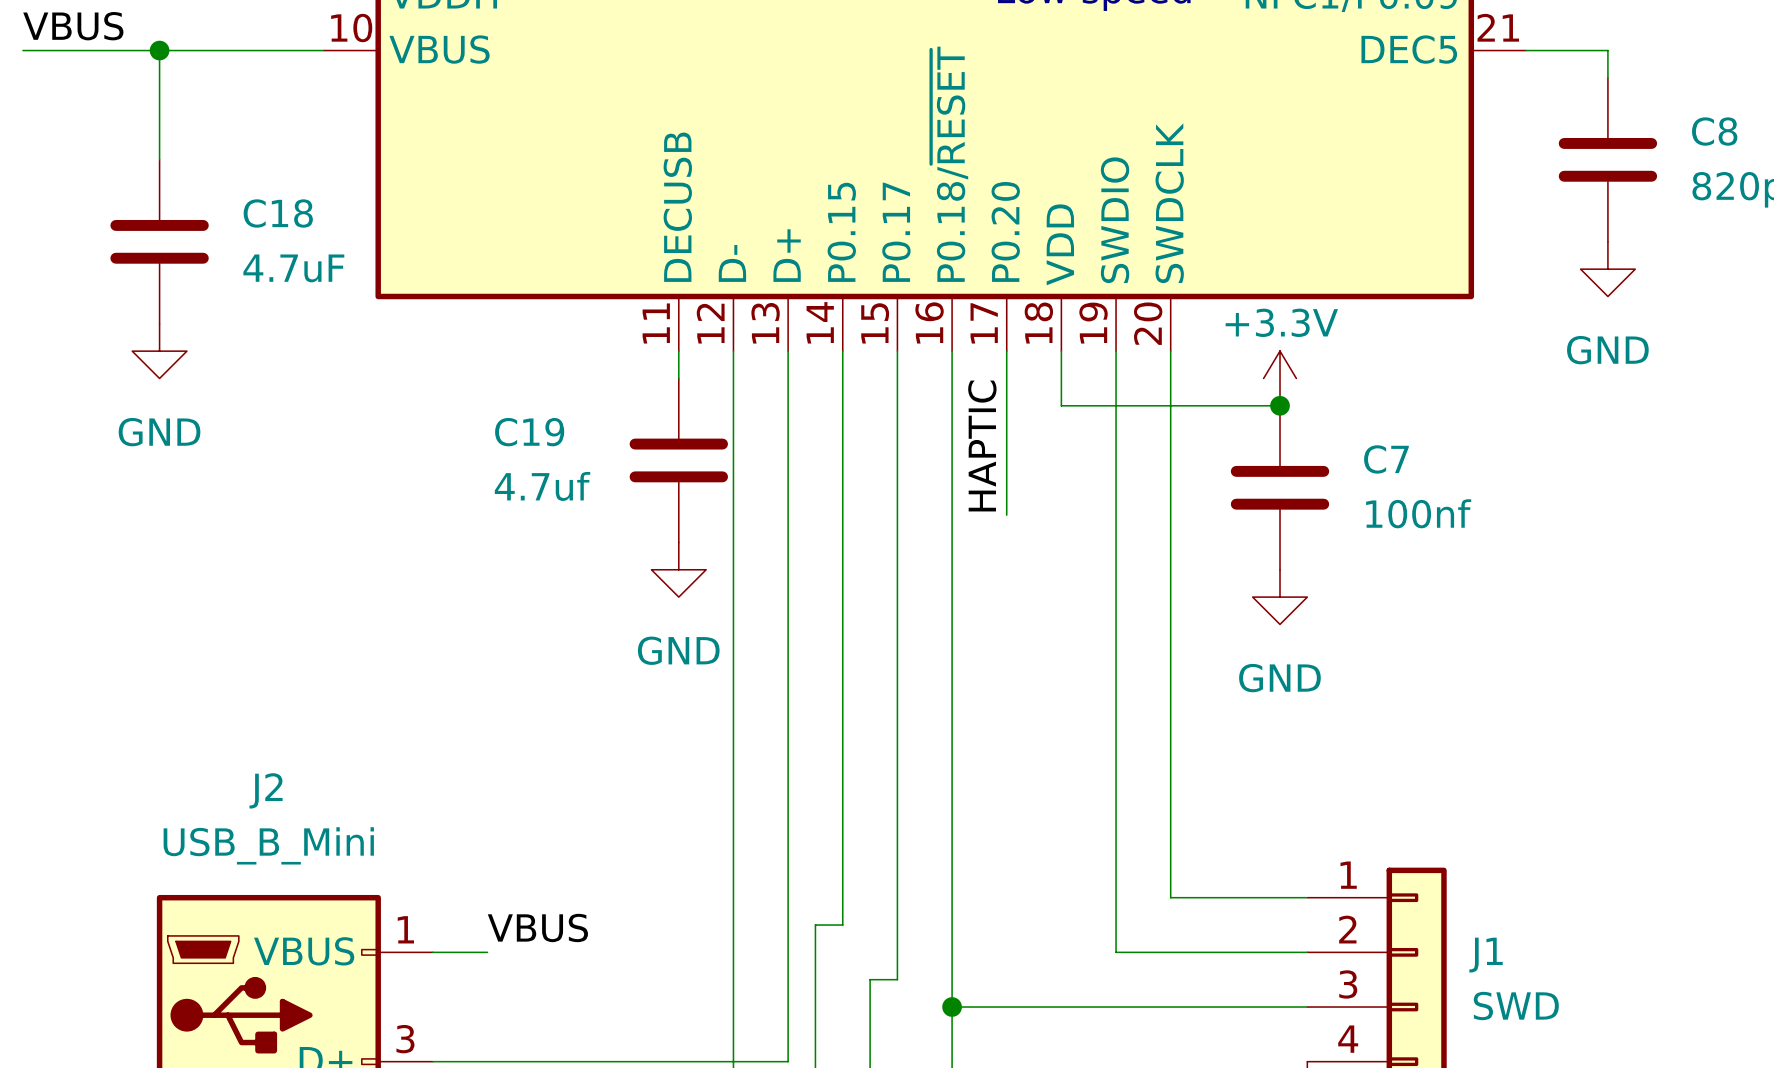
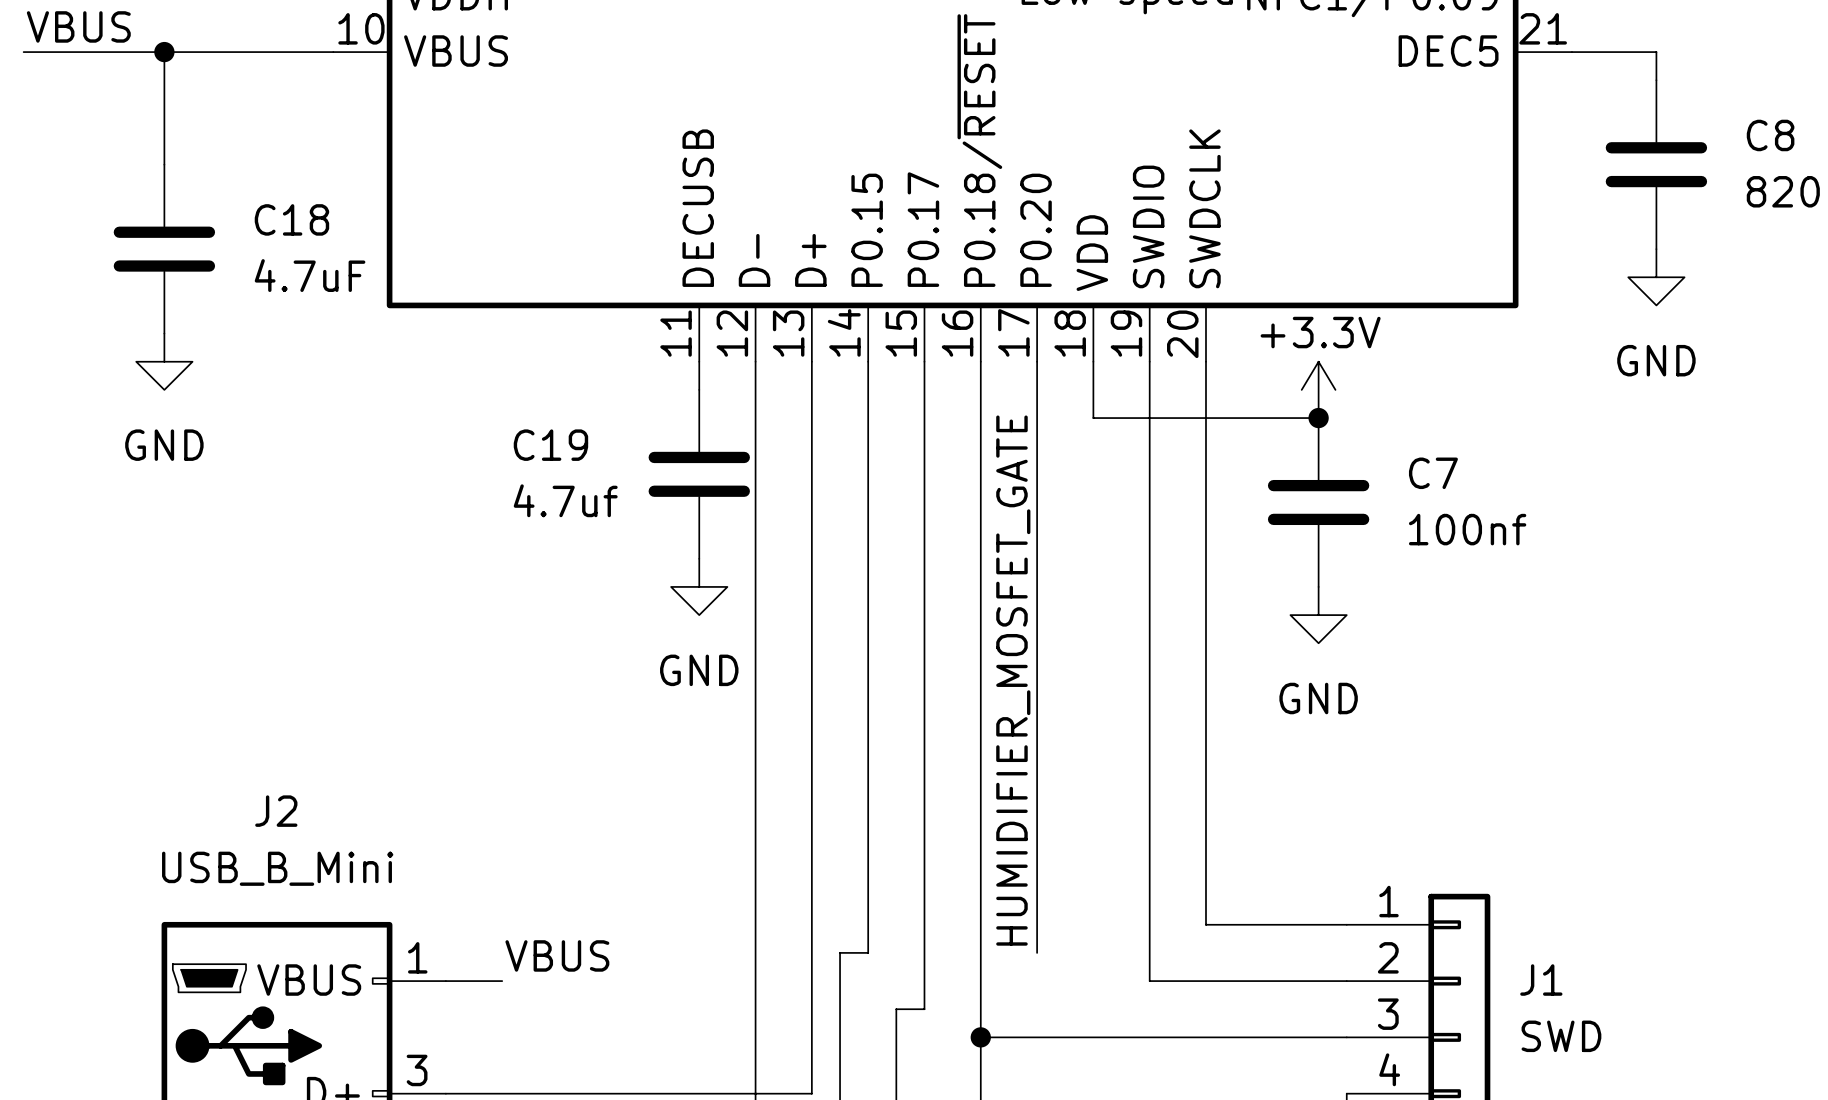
label: HAPTIC (982, 446) -> none
wire: none -> (1037, 530) (1037, 952)
label: none -> HUMIDIFIER_MOSFET_GATE (1013, 680)

